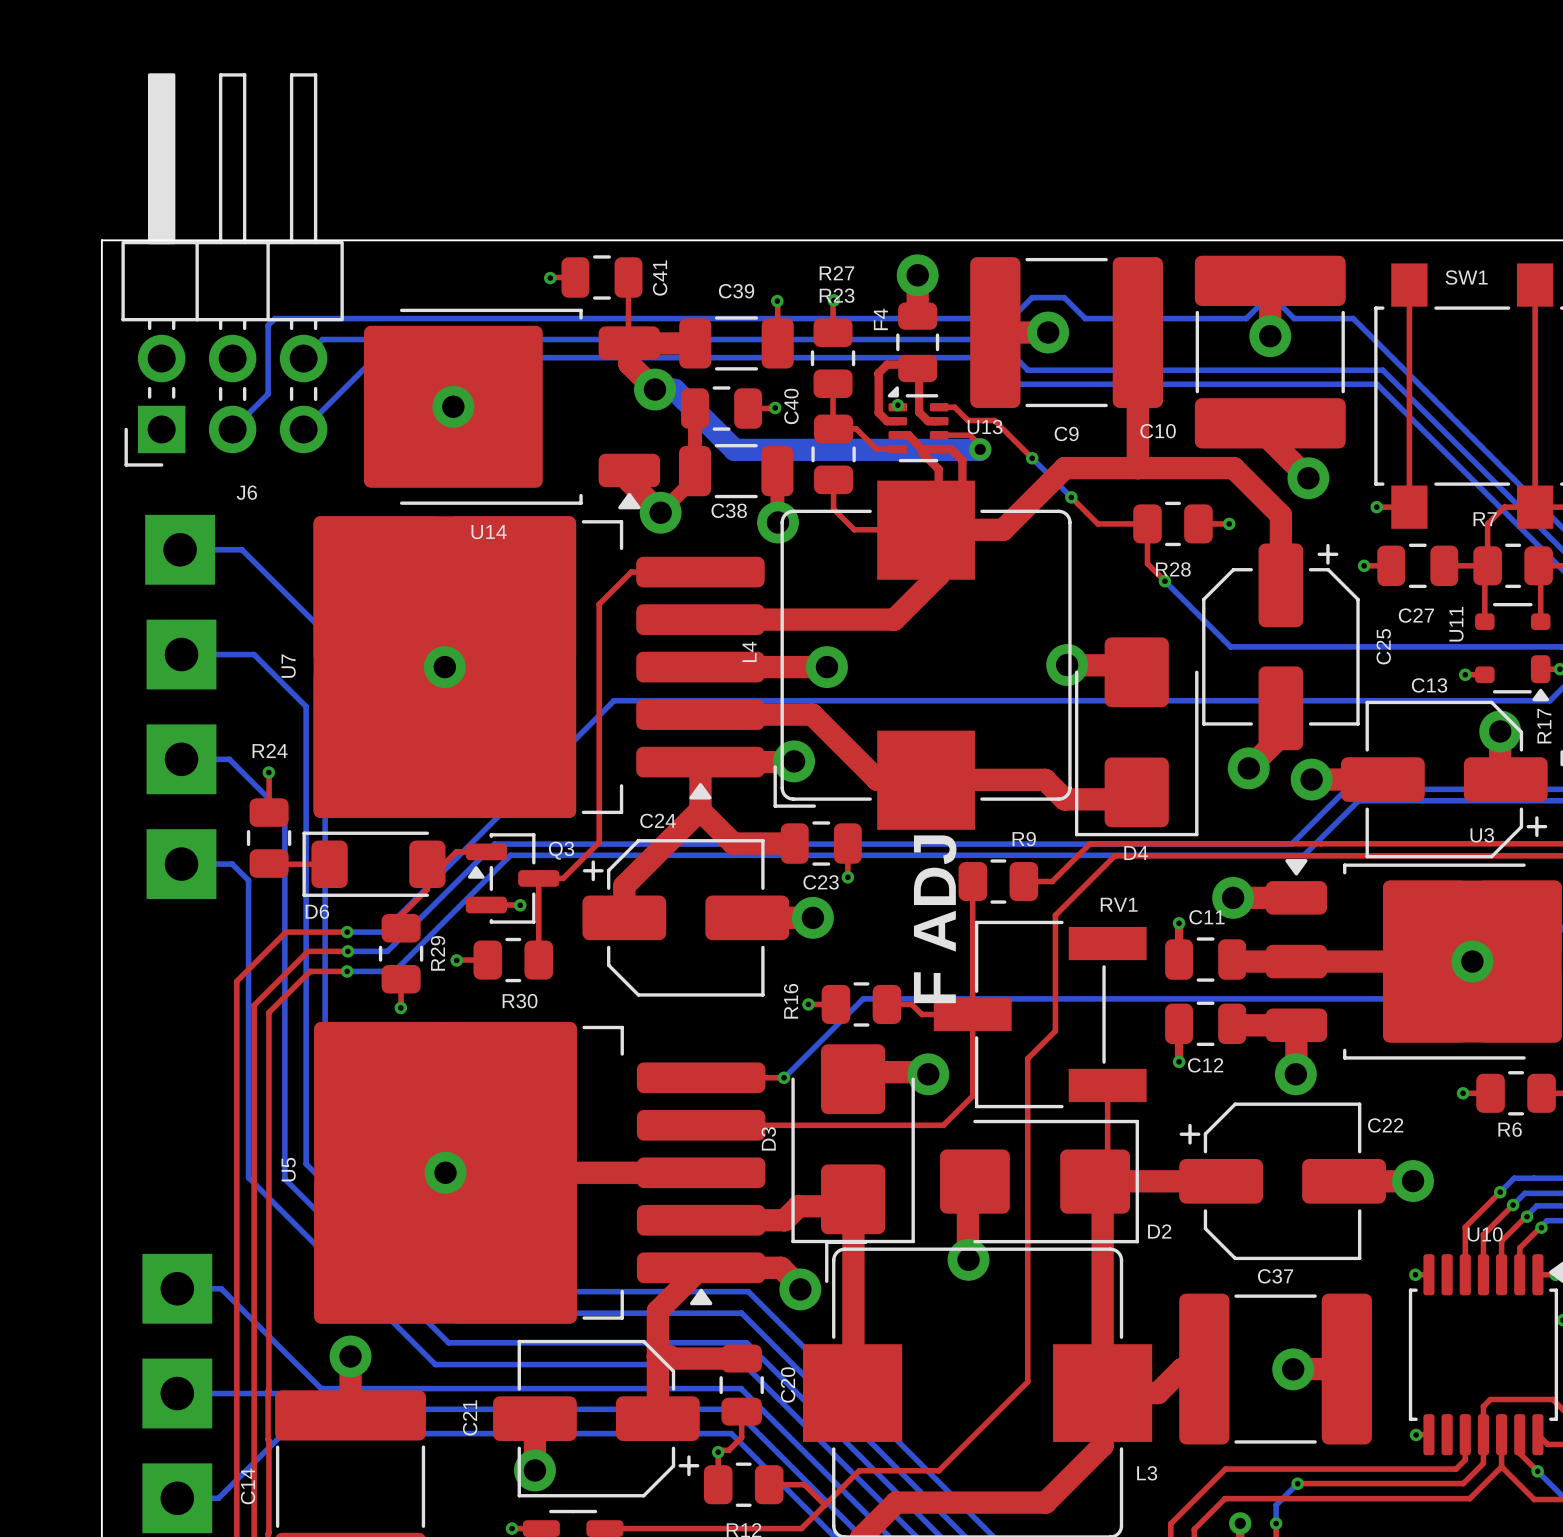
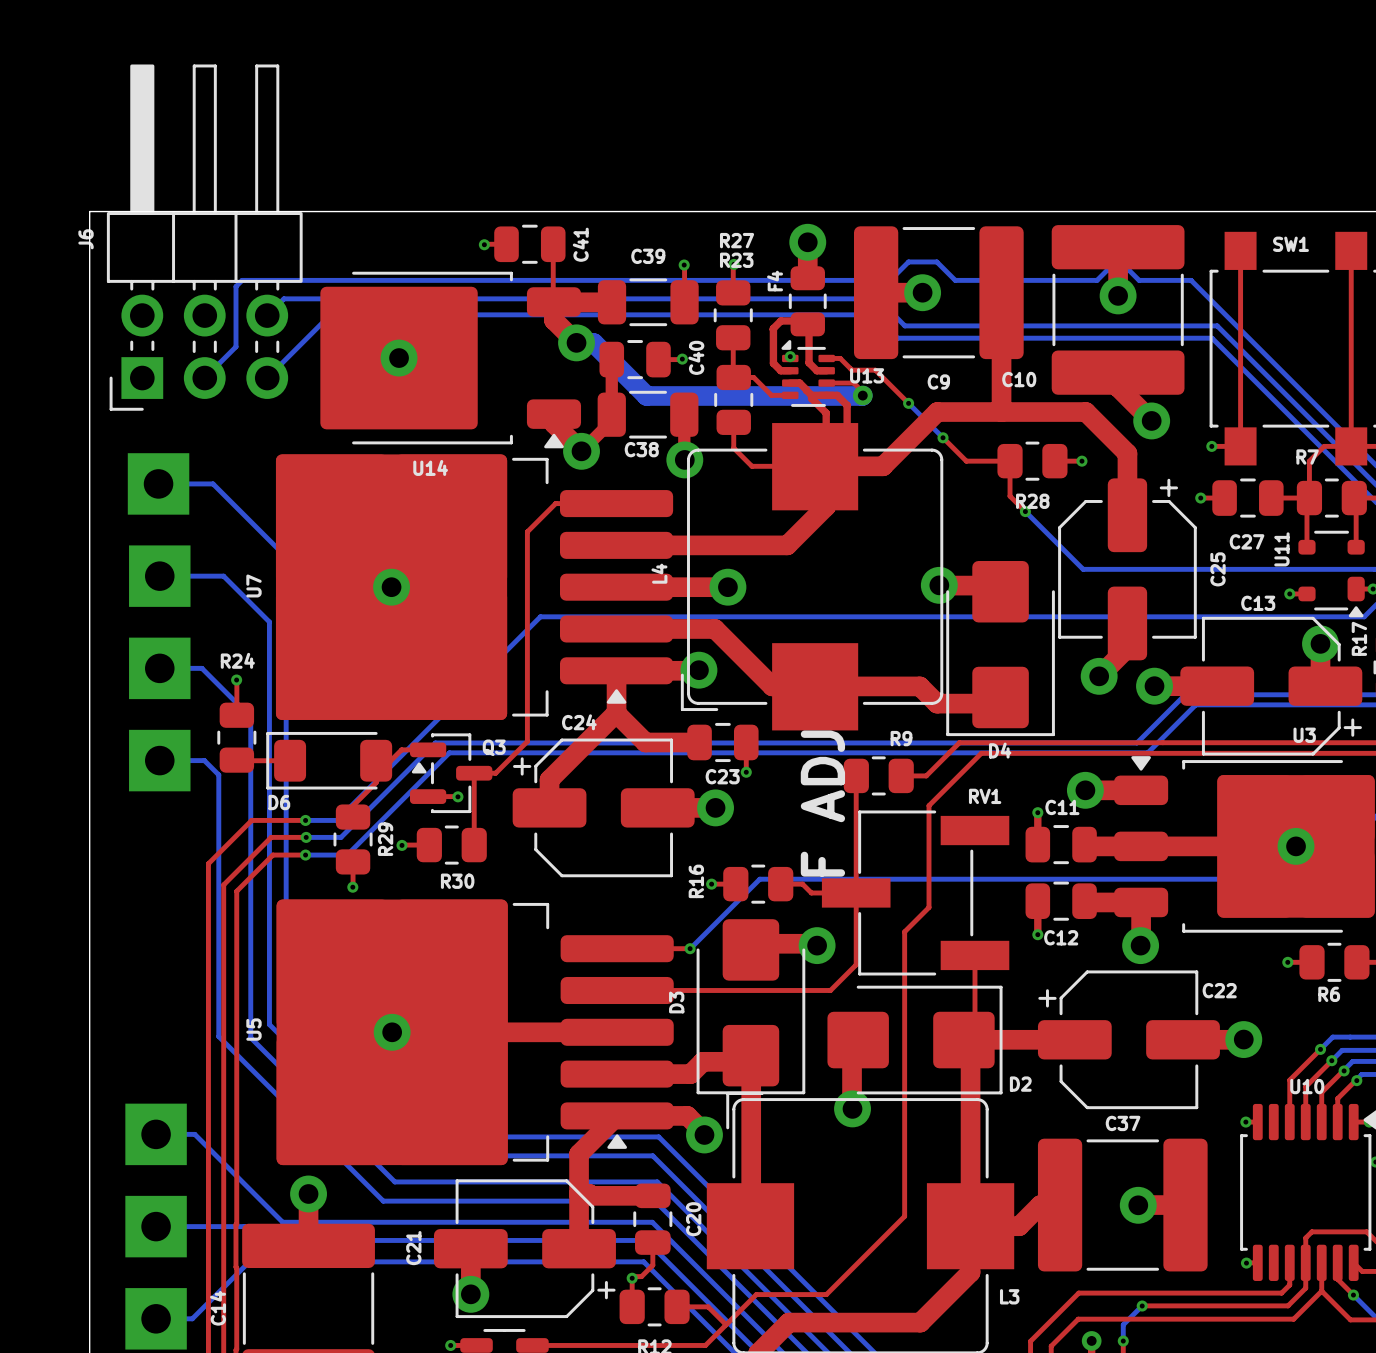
J6 name rotation: 0° (246, 492) -> 90° counterclockwise (86, 239)
J6 name position: J6 (246, 492) -> J6 (86, 239)

